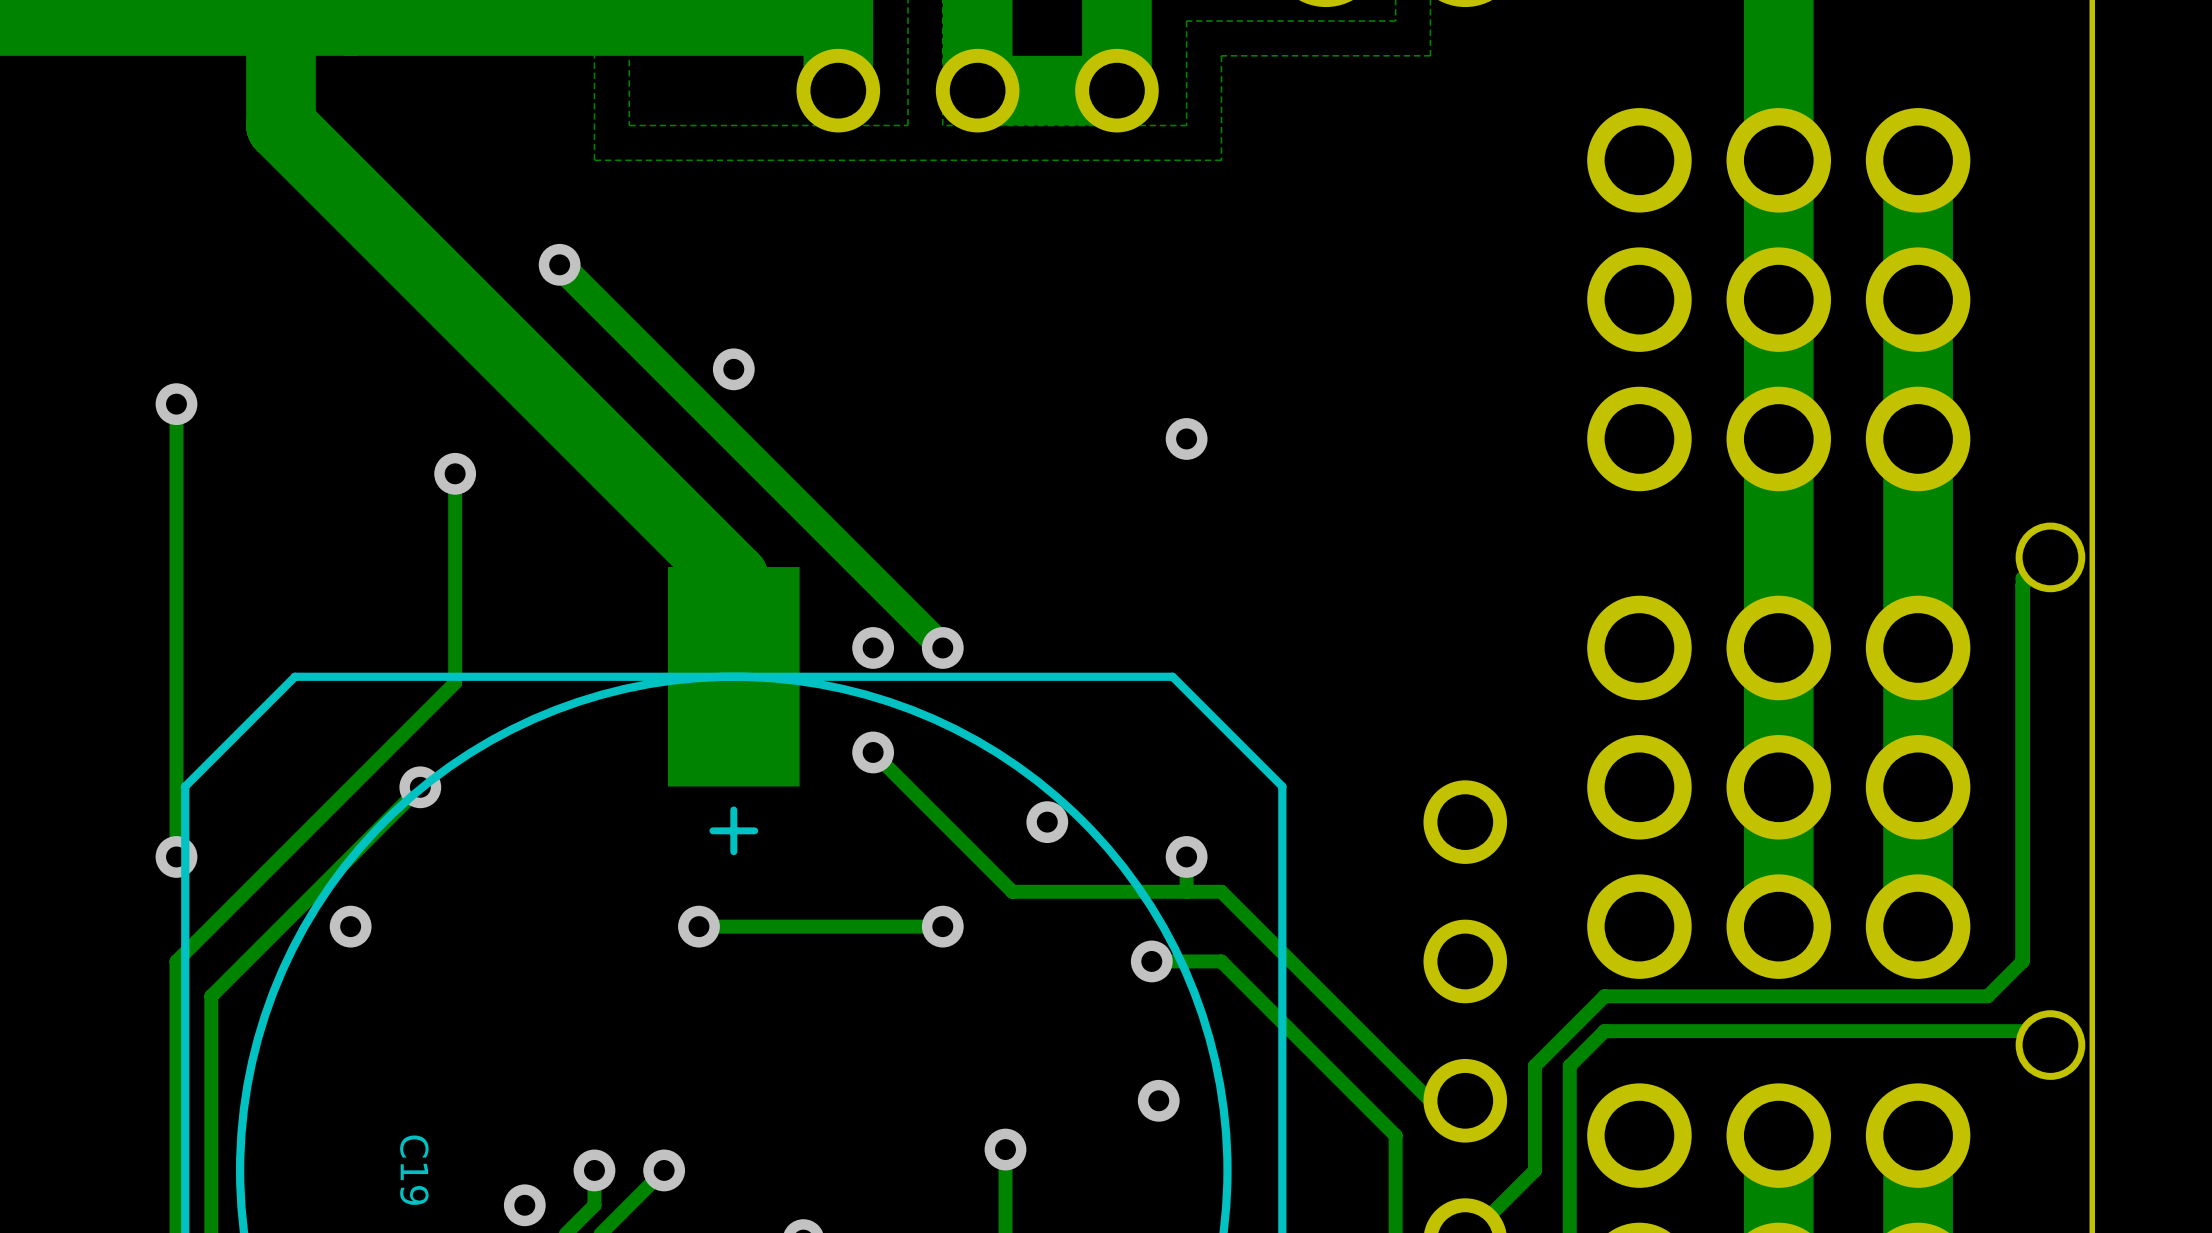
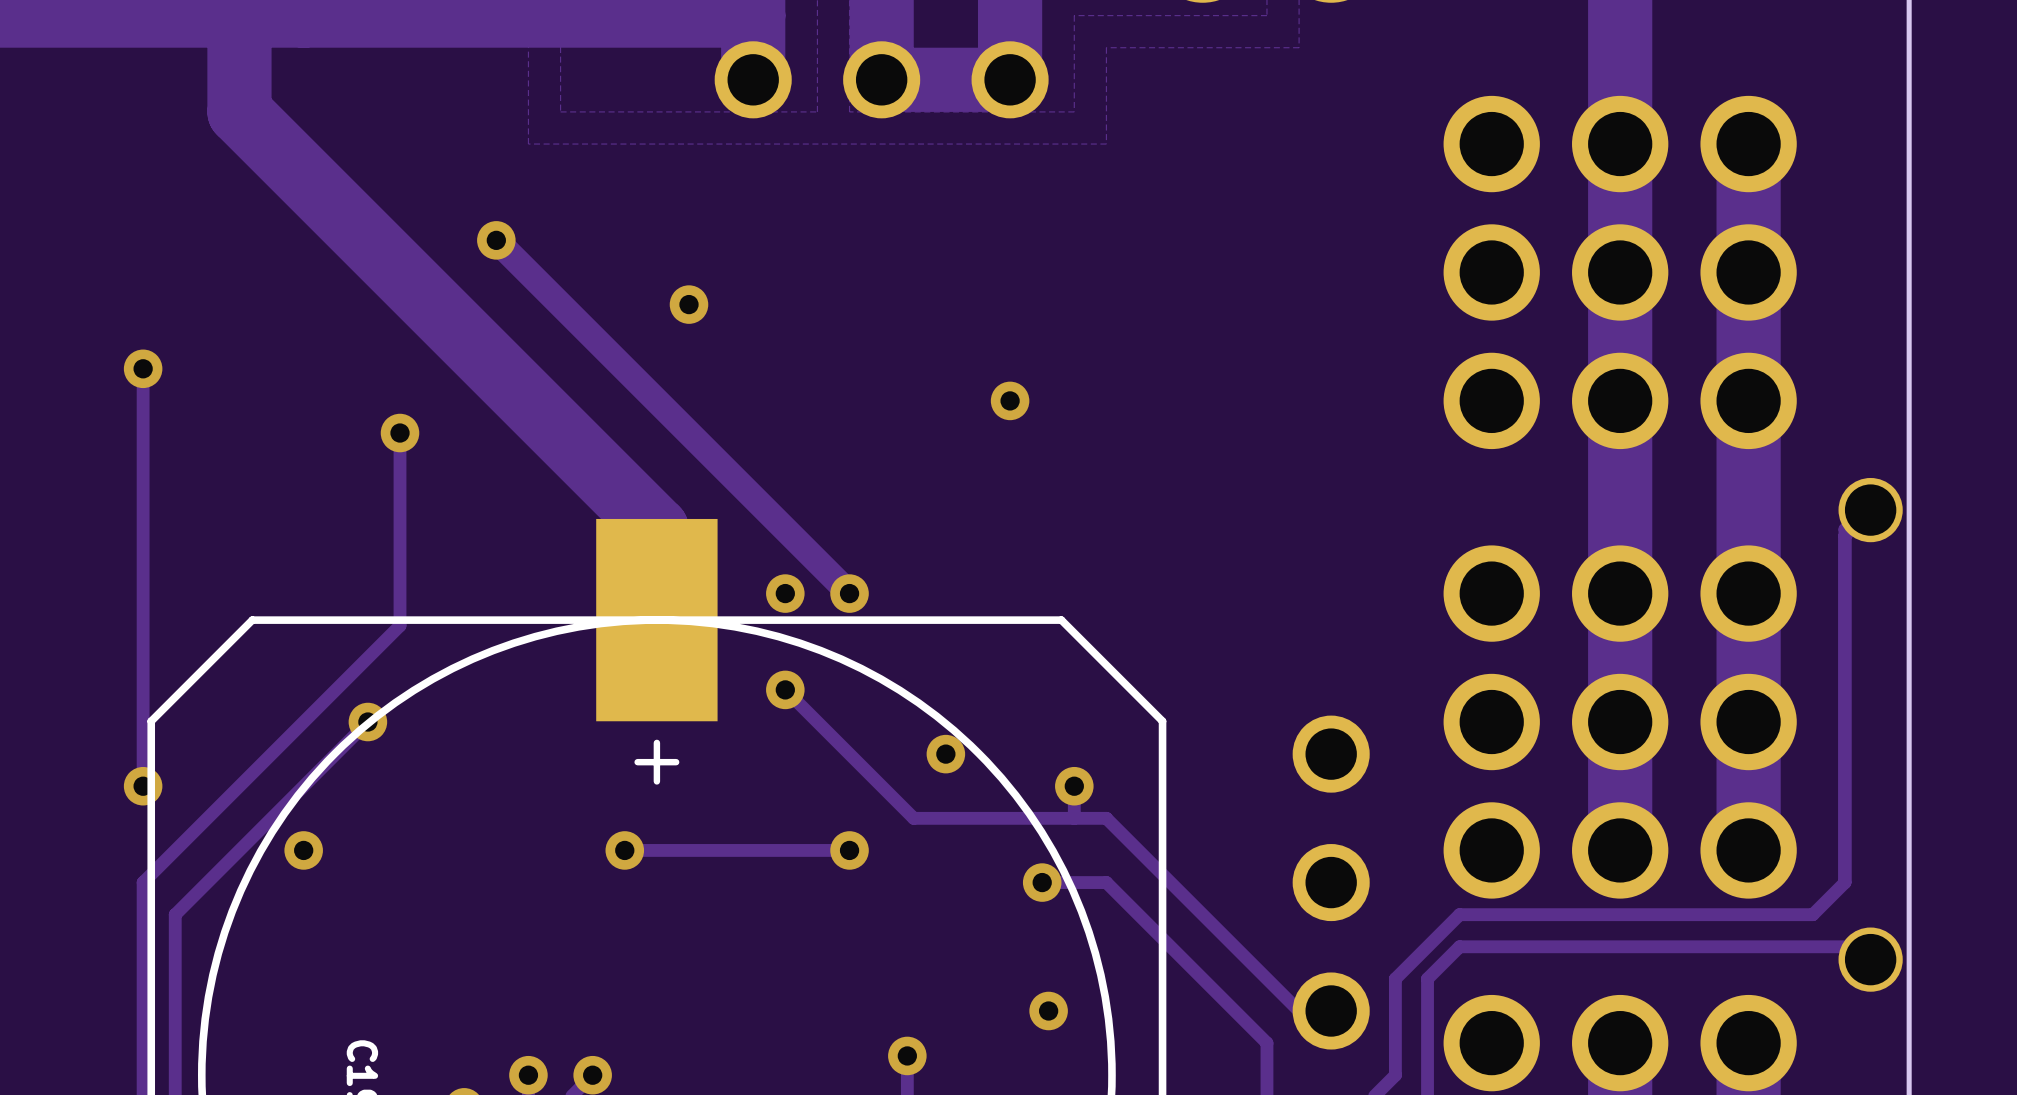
via position: (733, 369) -> (688, 304)
via position: (1186, 438) -> (1010, 400)

